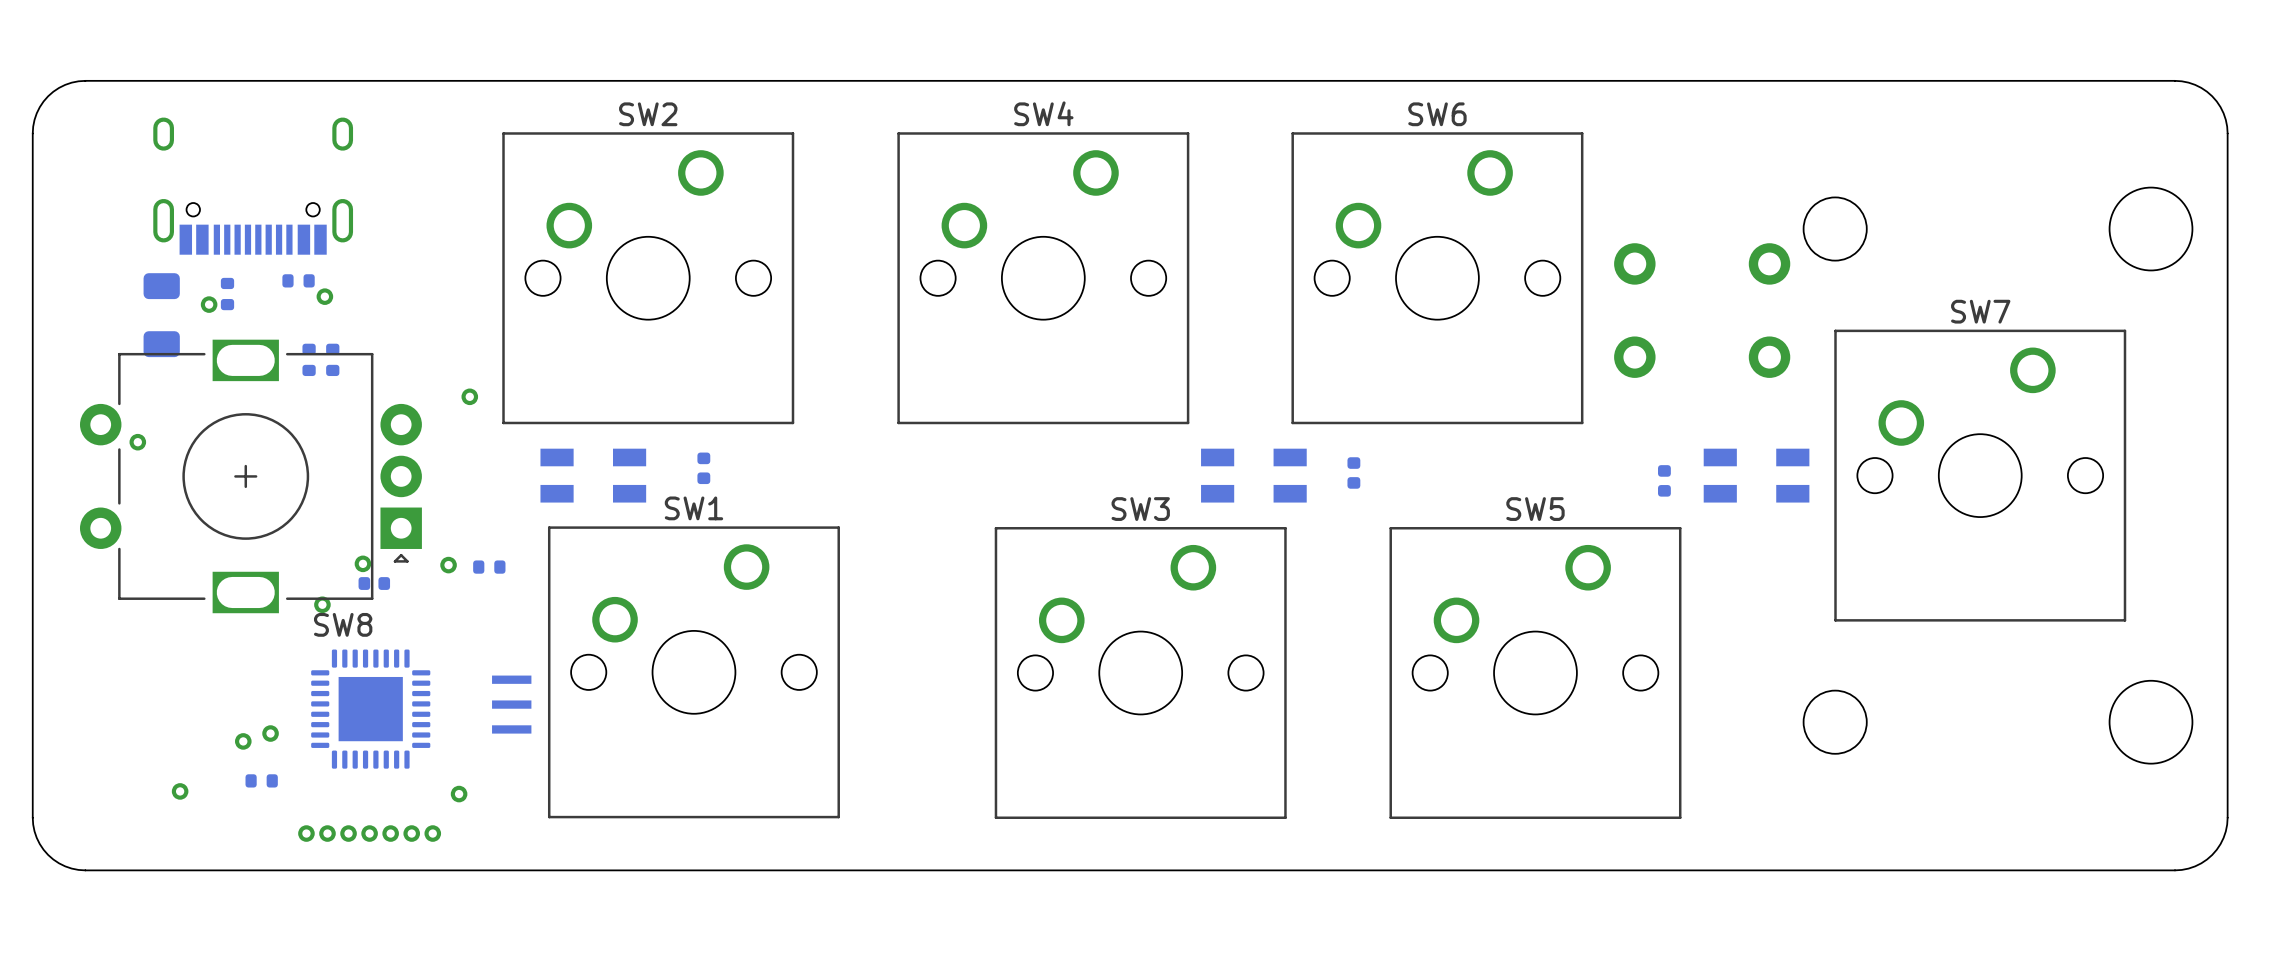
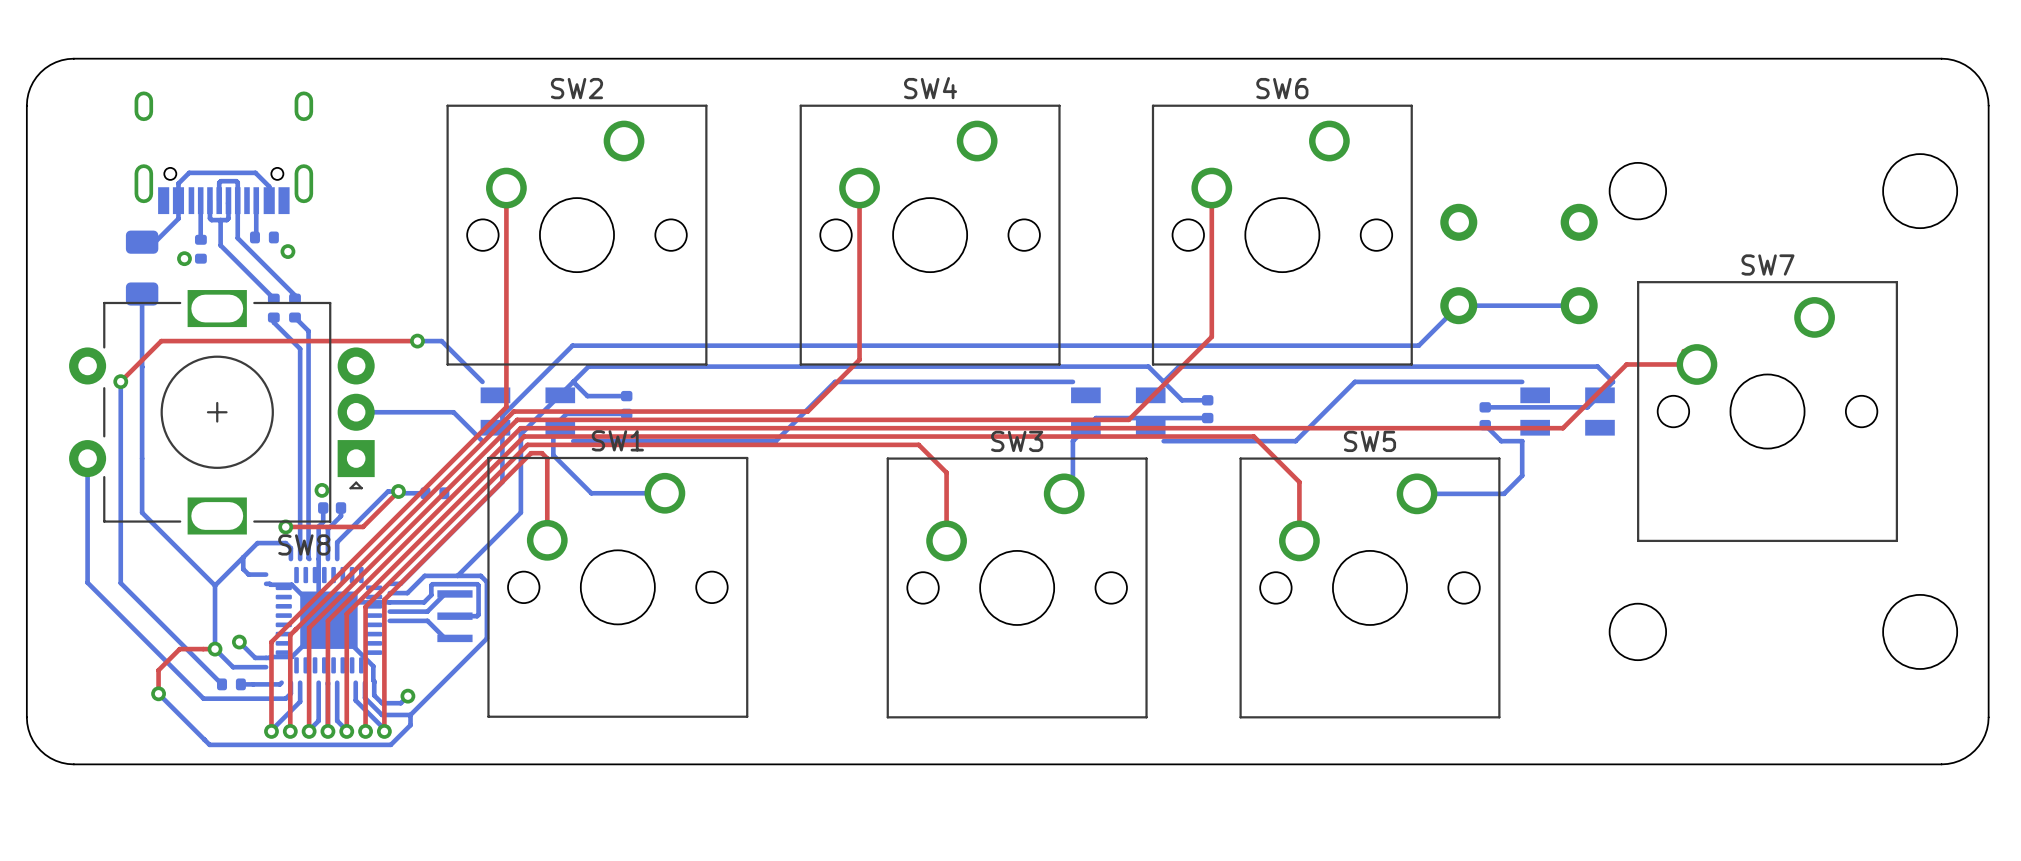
top track: none -> (506, 188) (506, 407) (271, 642) (271, 731)
top track: none -> (859, 188) (859, 359) (807, 411) (513, 411) (290, 635) (290, 731)
top track: none -> (1211, 188) (1211, 336) (1128, 419) (517, 419) (309, 627) (309, 731)
bottom track: none -> (200, 200) (200, 237)
bottom track: none -> (209, 200) (209, 218) (211, 220) (228, 218) (228, 200)
bottom track: none -> (219, 200) (219, 182) (236, 181) (237, 238) (295, 295) (295, 298)
bottom track: none -> (256, 200) (254, 237)
bottom track: none -> (269, 200) (269, 186) (255, 172) (189, 172) (178, 183) (178, 218) (155, 242) (142, 242)
bottom track: none -> (220, 220) (220, 245) (273, 298)
bottom track: none -> (142, 294) (142, 512) (215, 585)
bottom track: none -> (1579, 305) (1458, 305) (1418, 345) (572, 345) (502, 415) (502, 482) (400, 583) (389, 583)
bottom track: none -> (273, 317) (273, 322) (300, 348) (300, 559)
bottom track: none -> (295, 317) (308, 331) (309, 559)
top track: none -> (417, 341) (161, 341) (120, 381)
bottom track: none -> (417, 341) (441, 341) (482, 381)
top track: none -> (1683, 351) (1696, 364) (1626, 364) (1562, 428) (520, 428) (327, 620) (327, 731)
bottom track: none -> (120, 381) (120, 583) (222, 684)
bottom track: none -> (573, 381) (587, 396) (626, 396)
bottom track: none -> (1072, 381) (835, 381) (775, 441) (573, 441)
bottom track: none -> (1163, 381) (1178, 366) (1597, 366) (1612, 381) (1587, 407) (1485, 407)
bottom track: none -> (1522, 381) (1354, 381) (1295, 441) (1163, 441)
bottom track: none -> (1207, 400) (1182, 400) (1148, 366) (588, 366) (520, 434) (520, 512) (457, 575)
bottom track: none -> (356, 412) (453, 412) (482, 441)
bottom track: none -> (626, 413) (566, 413) (553, 427) (553, 455) (591, 493) (664, 493)
bottom track: none -> (1207, 418) (1096, 418) (1072, 441) (1072, 485) (1064, 493)
bottom track: none -> (1485, 425) (1501, 441) (1522, 441) (1522, 475) (1504, 493) (1417, 493)
bottom track: none -> (87, 458) (87, 582) (203, 698) (285, 698) (290, 693) (290, 682)
top track: none -> (398, 491) (363, 526) (285, 526)
bottom track: none -> (425, 493) (388, 491) (337, 542) (337, 559)
bottom track: none -> (323, 507) (323, 522) (318, 526) (318, 611) (327, 602)
bottom track: none -> (341, 507) (341, 516) (327, 529) (327, 559)
top track: none -> (547, 540) (547, 458) (541, 453) (531, 453) (384, 599) (384, 731)
top track: none -> (946, 540) (946, 472) (918, 444) (527, 444) (365, 606) (365, 731)
top track: none -> (1299, 540) (1299, 482) (1253, 436) (524, 436) (346, 613) (346, 731)
bottom track: none -> (243, 557) (243, 569) (248, 574) (266, 574)
bottom track: none -> (290, 559) (290, 548) (285, 543) (257, 543) (215, 585)
bottom track: none -> (266, 583) (291, 584) (373, 666) (374, 695) (382, 703) (400, 703) (407, 696)
bottom track: none -> (215, 585) (215, 649) (233, 667) (266, 667)
bottom track: none -> (389, 593) (407, 593) (424, 575) (480, 575) (486, 581) (486, 638) (410, 714)
bottom track: none -> (454, 593) (445, 593) (427, 611) (389, 611)
bottom track: none -> (454, 616) (478, 614) (477, 584) (432, 584) (431, 595) (424, 602) (346, 602) (291, 656) (255, 657) (239, 642)
bottom track: none -> (389, 620) (427, 620) (445, 638) (454, 638)
top track: none -> (215, 649) (179, 649) (158, 670) (158, 693)
bottom track: none -> (281, 682) (279, 684) (240, 684)
bottom track: none -> (300, 682) (300, 701) (271, 731)
bottom track: none -> (318, 682) (318, 720) (309, 731)
bottom track: none -> (337, 682) (337, 720) (346, 731)
bottom track: none -> (355, 682) (355, 700) (384, 729) (384, 731)
bottom track: none -> (364, 682) (364, 697) (382, 714) (410, 714)
bottom track: none -> (158, 693) (209, 744) (390, 744) (410, 725) (410, 714)

